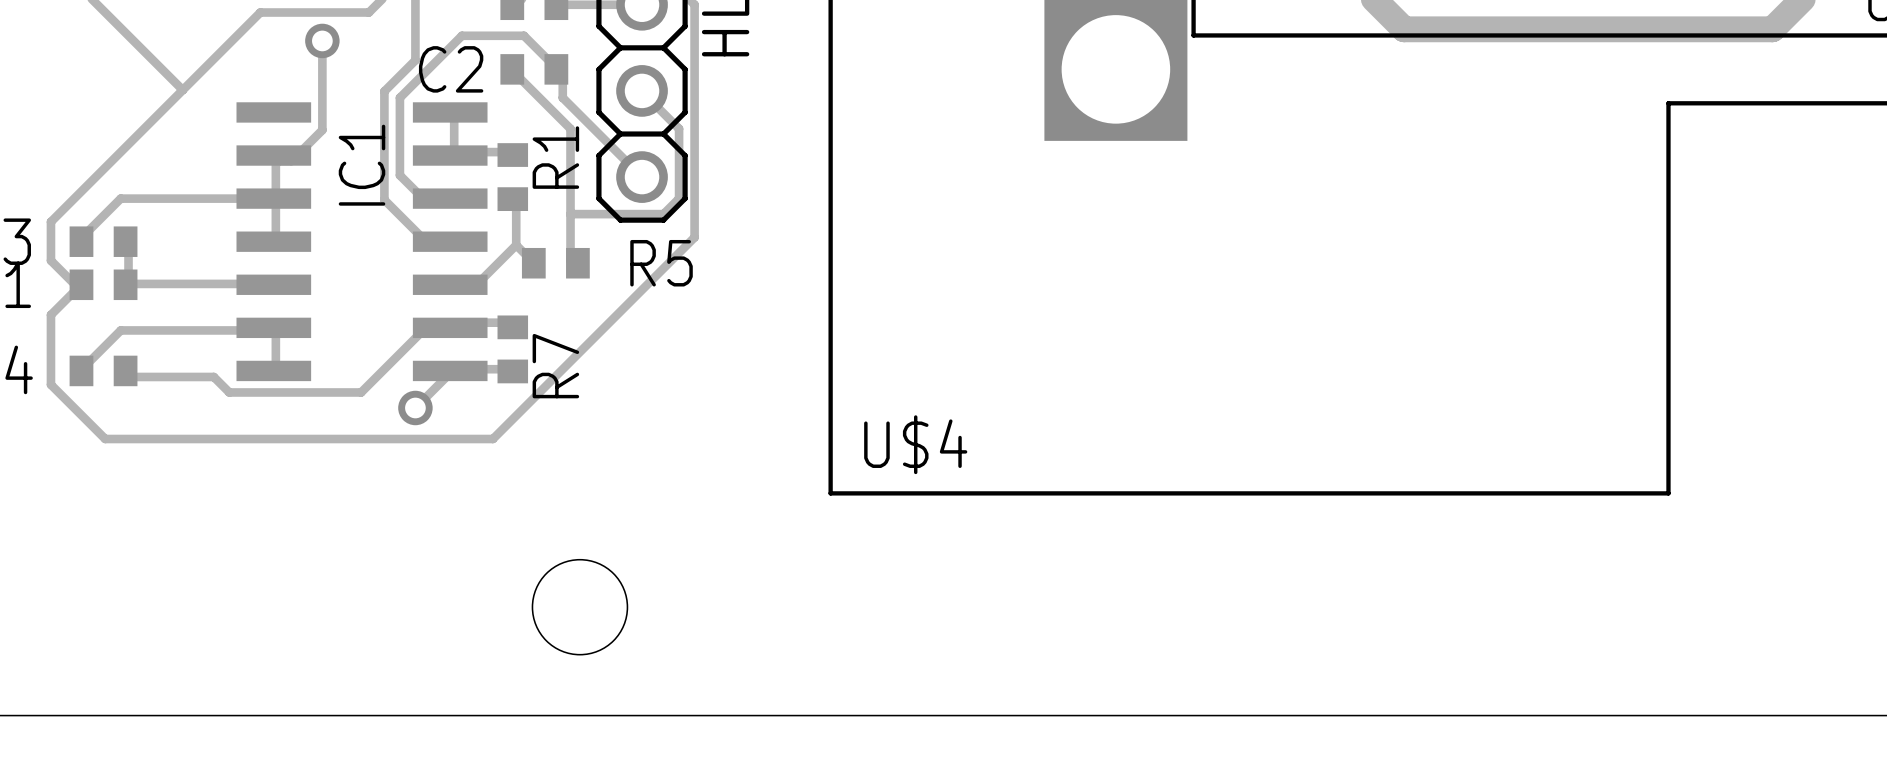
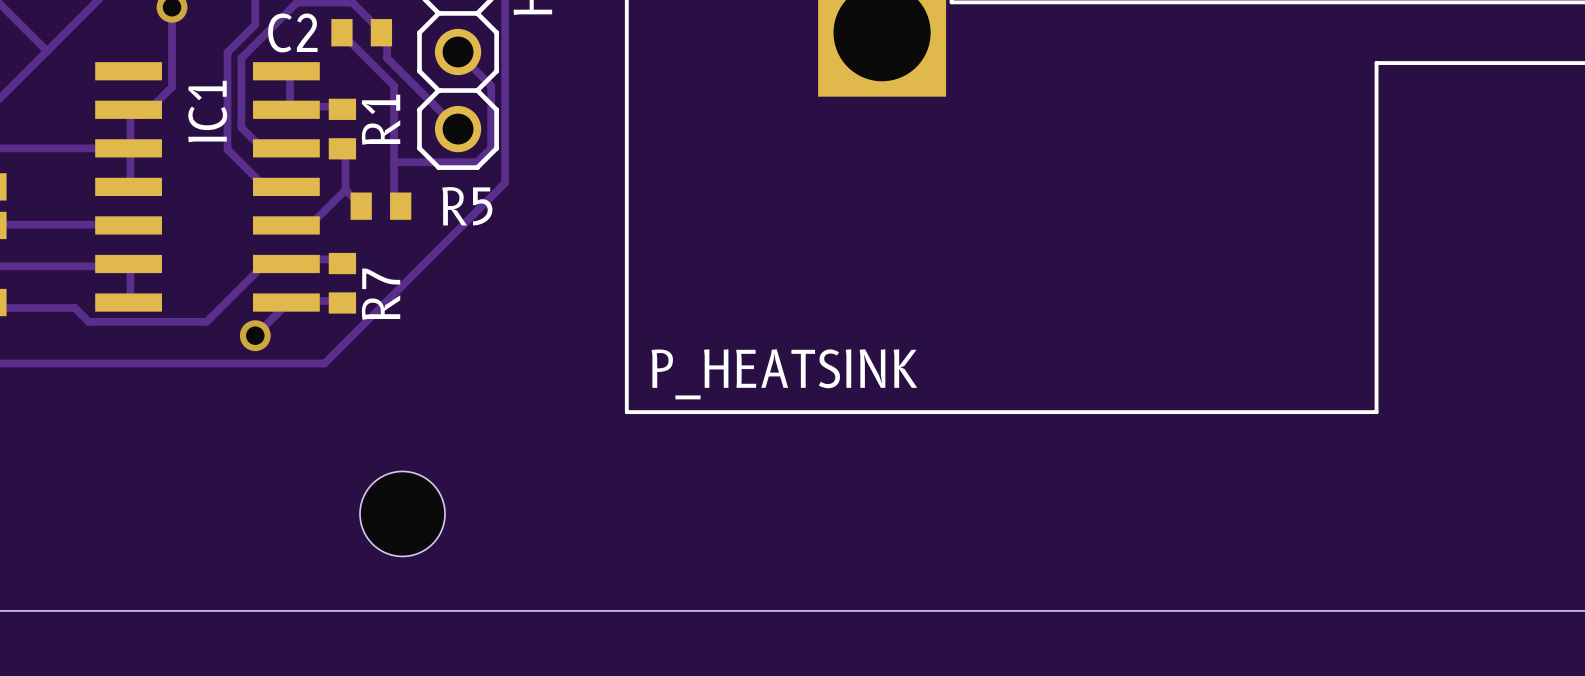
U$4 name: U$4 (915, 444) -> P_HEATSINK (784, 374)

